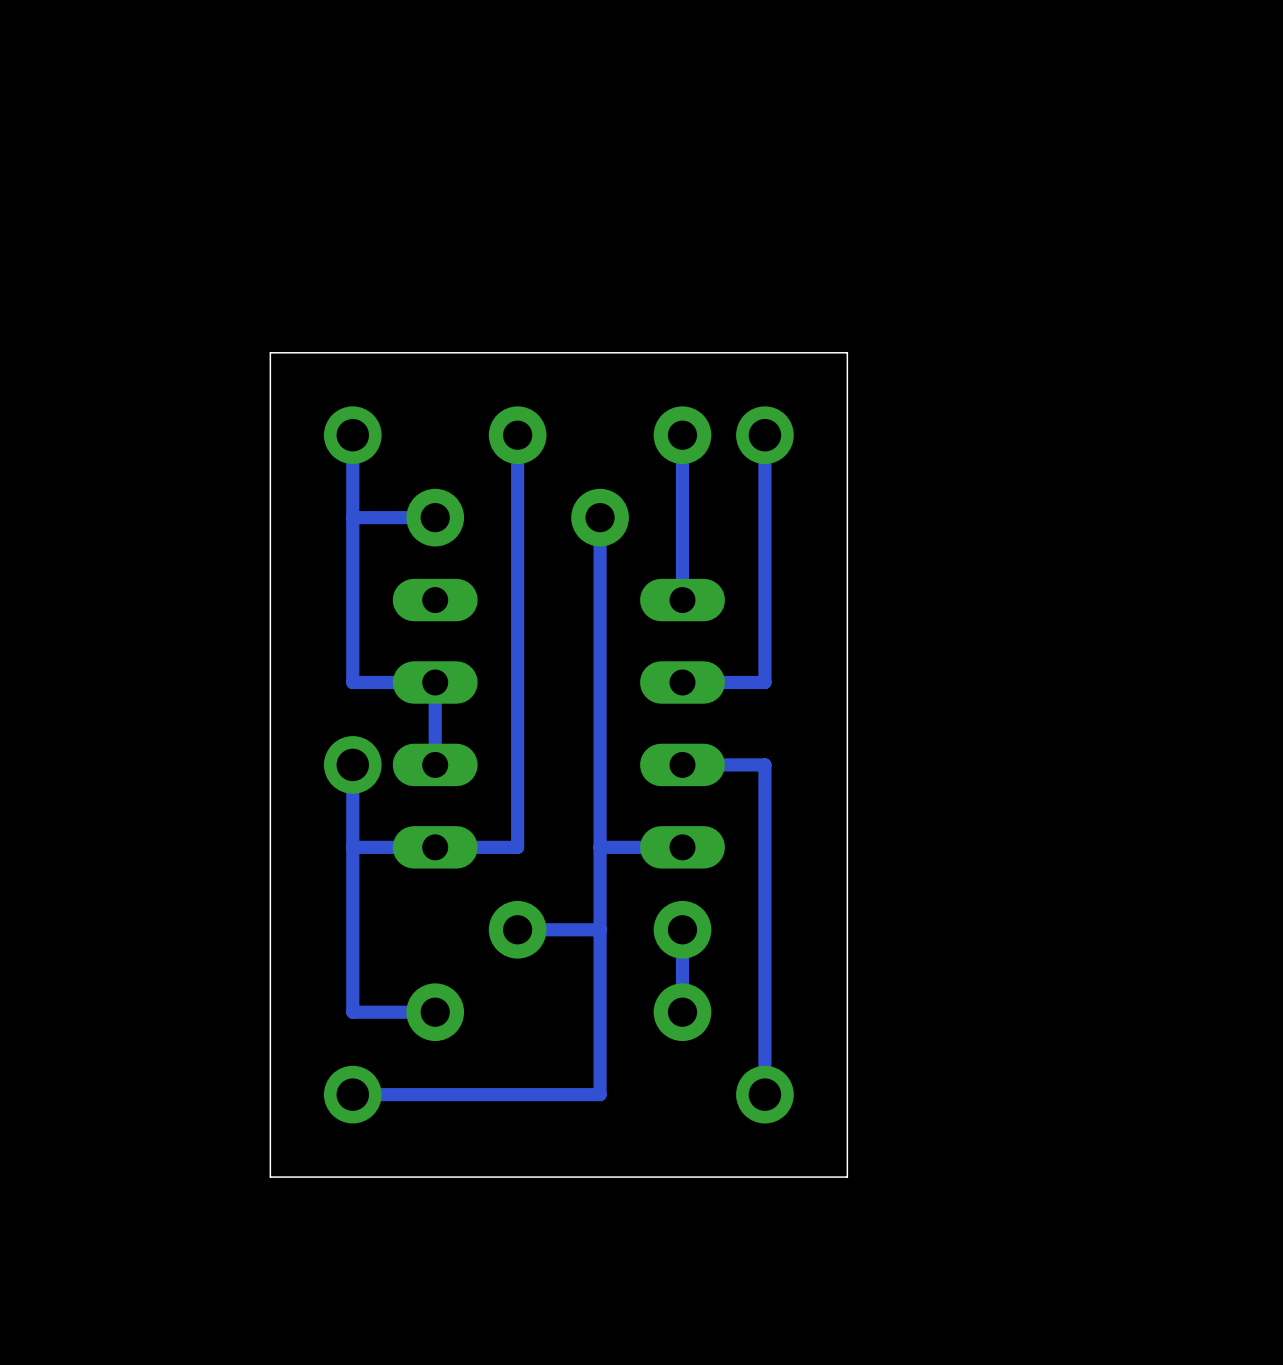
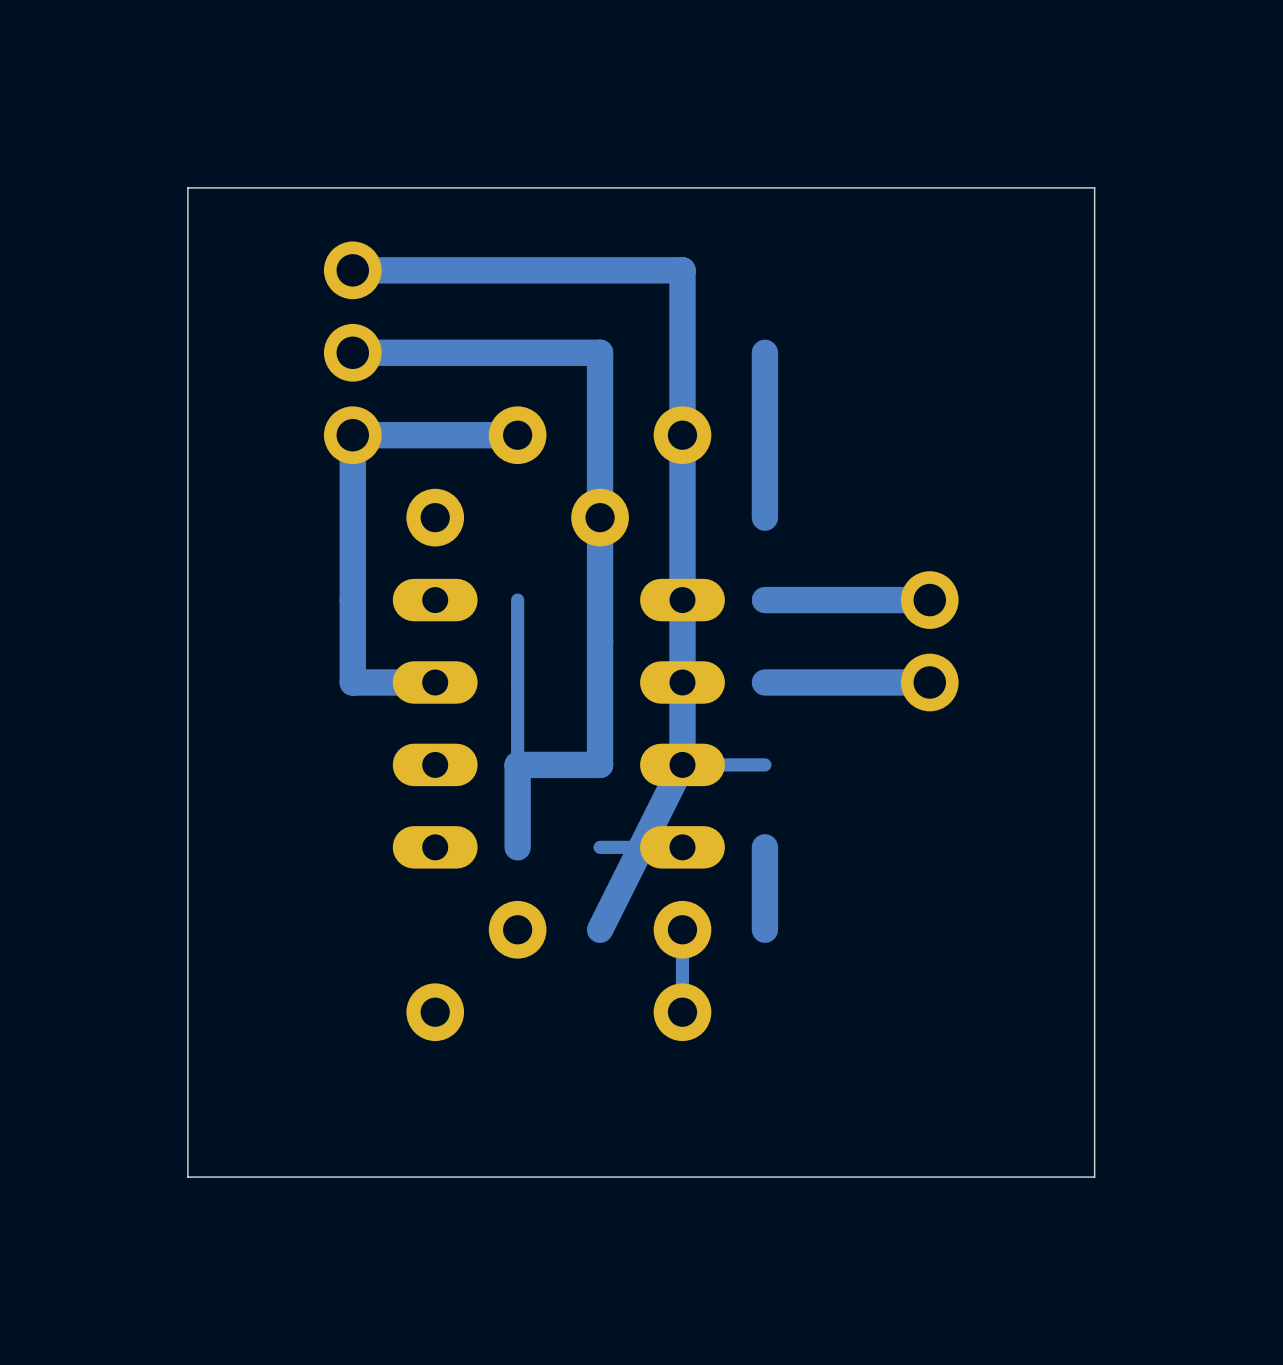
bottom track: none -> (352, 270) (682, 270) (682, 435)
part: none -> (352, 270)
bottom track: none -> (352, 352) (600, 352) (600, 517)
part: none -> (352, 352)
bottom track width: thin (352, 435) (352, 682) (435, 682) -> thick (352, 435) (352, 682) (435, 682)
bottom track: (517, 435) (517, 600) -> (517, 435) (352, 435)
bottom track width: thin (682, 435) (682, 600) -> thick (682, 435) (682, 600)
bottom track width: thin (764, 435) (764, 517) -> thick (764, 435) (764, 517)
part: (764, 435) -> none
bottom track: (435, 517) (352, 517) -> none
bottom track width: thin (600, 517) (600, 764) -> thick (600, 517) (600, 764)
bottom track: (764, 517) (764, 682) (682, 682) -> none
bottom track: none -> (929, 600) (764, 600)
part: none -> (929, 600)
bottom track: (435, 682) (435, 764) -> none
part: none -> (929, 682)
bottom track: (352, 764) (352, 1012) (435, 1012) -> none
part: (352, 764) -> none
bottom track width: thin (517, 764) (517, 847) -> thick (517, 764) (517, 847)
bottom track: (600, 764) (600, 1094) (352, 1094) -> (600, 764) (517, 764)
bottom track: (764, 764) (764, 847) -> (764, 352) (764, 435)
bottom track: (517, 847) (352, 847) -> (929, 682) (764, 682)
bottom track width: thin (764, 847) (764, 929) -> thick (764, 847) (764, 929)
bottom track: (600, 929) (517, 929) -> (600, 929) (682, 764) (682, 600)
bottom track: (764, 929) (764, 1094) -> none
part: (352, 1094) -> none
part: (764, 1094) -> none
board edge: (847, 1177) (847, 352) (270, 352) (270, 1177) -> (847, 1177) (1094, 1177) (1094, 187) (187, 187) (187, 1177) (270, 1177)

